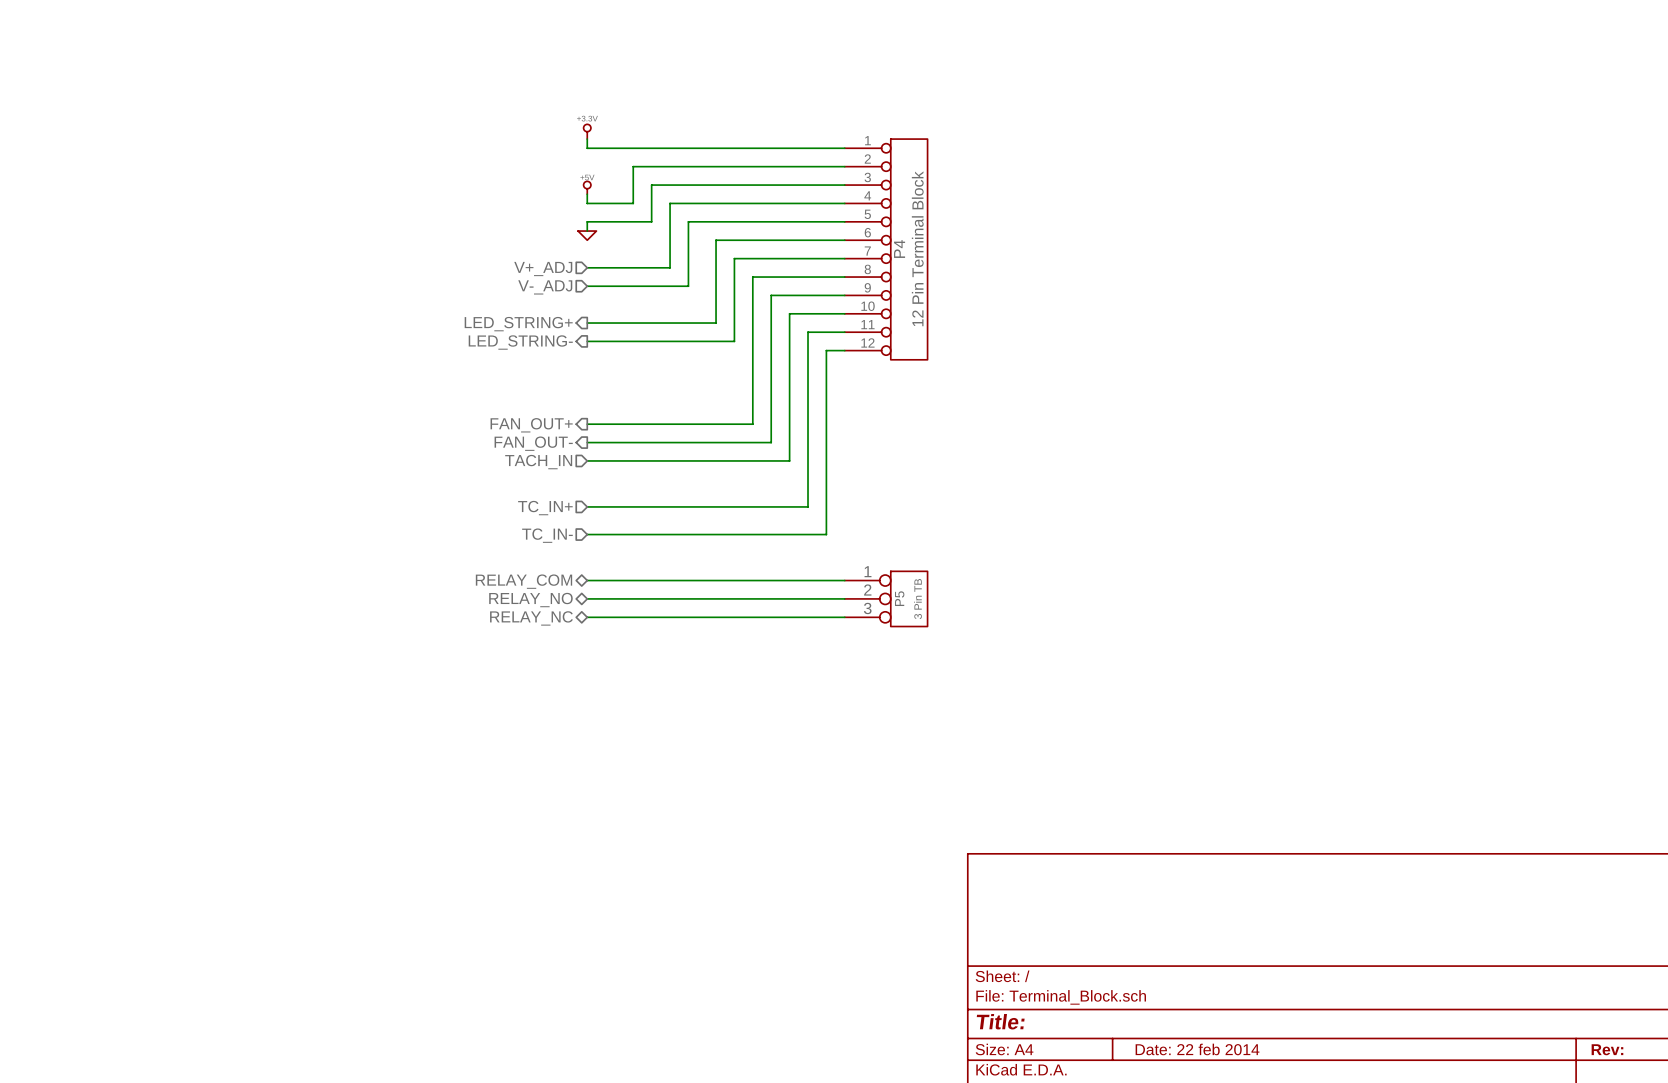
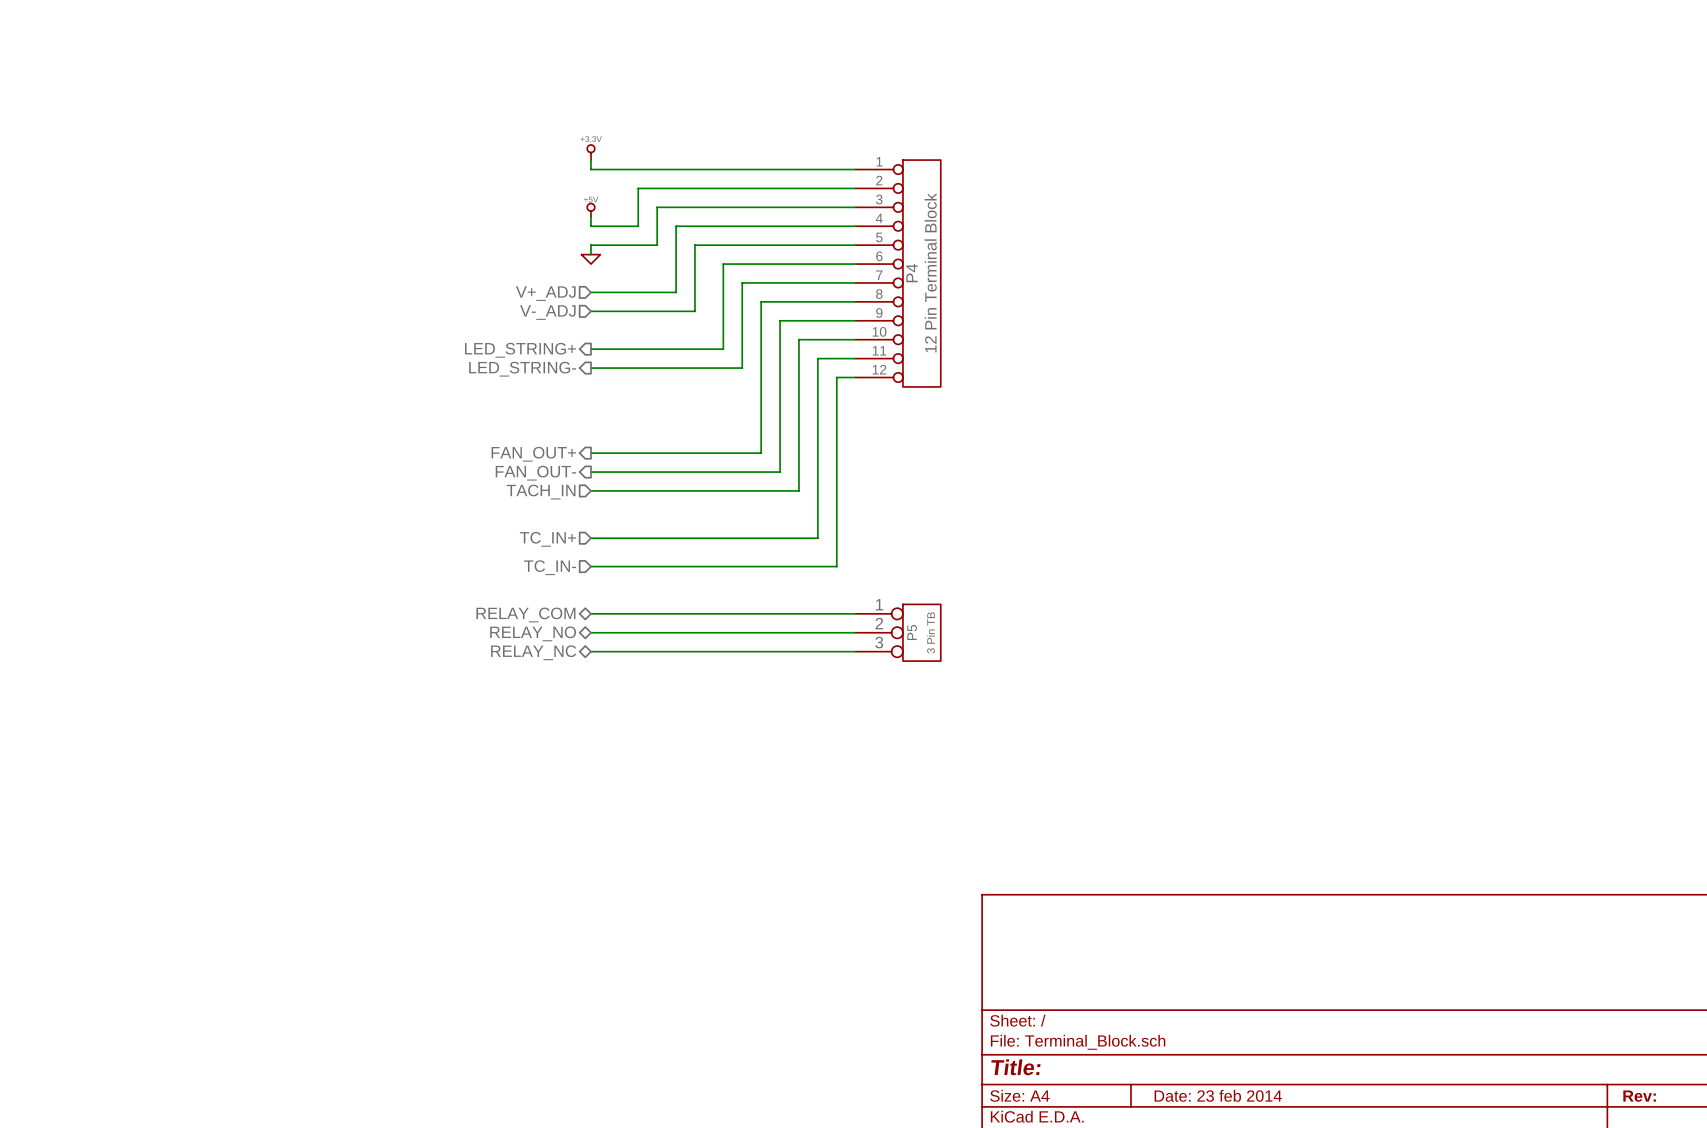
title block: Date: 22 feb 2014 (1197, 1049) -> Date: 23 feb 2014 (1218, 1095)

